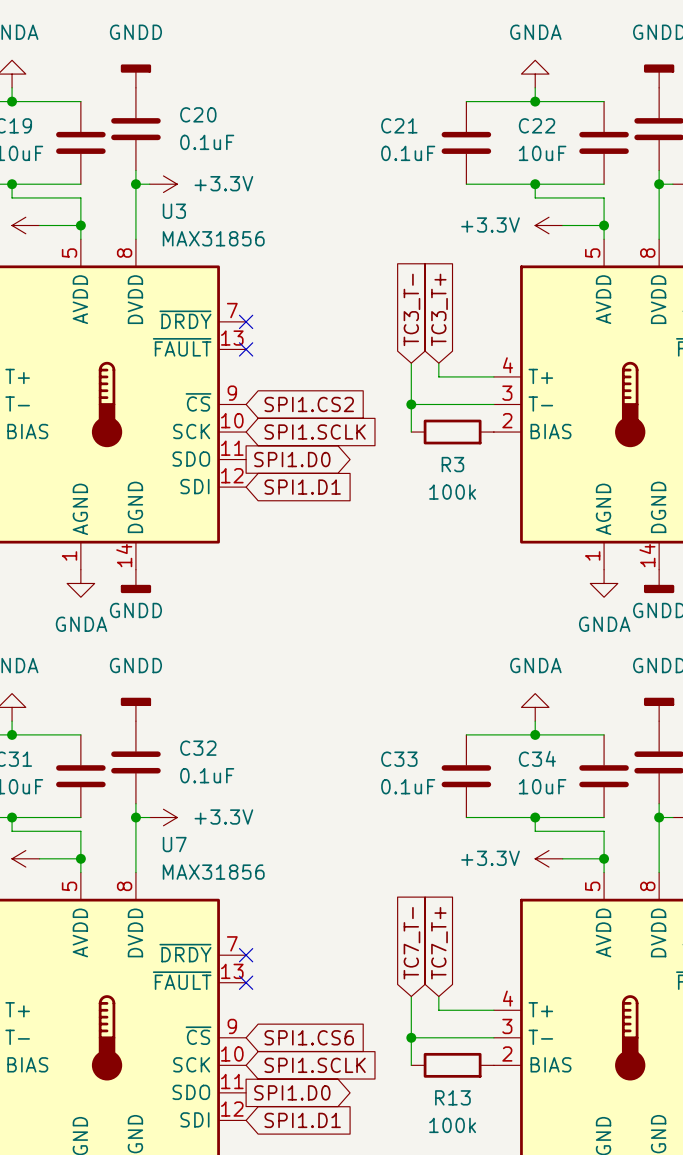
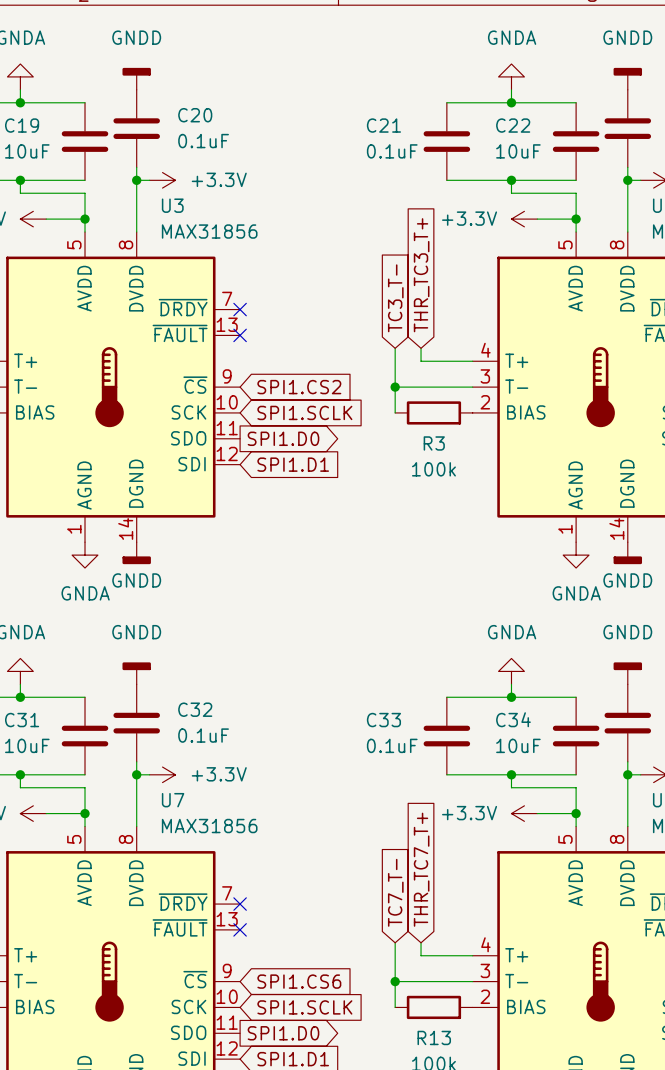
global label: TC3_T+ (439, 309) -> THR_TC3_T+ (421, 275)
global label: TC7_T+ (439, 943) -> THR_TC7_T+ (421, 869)

